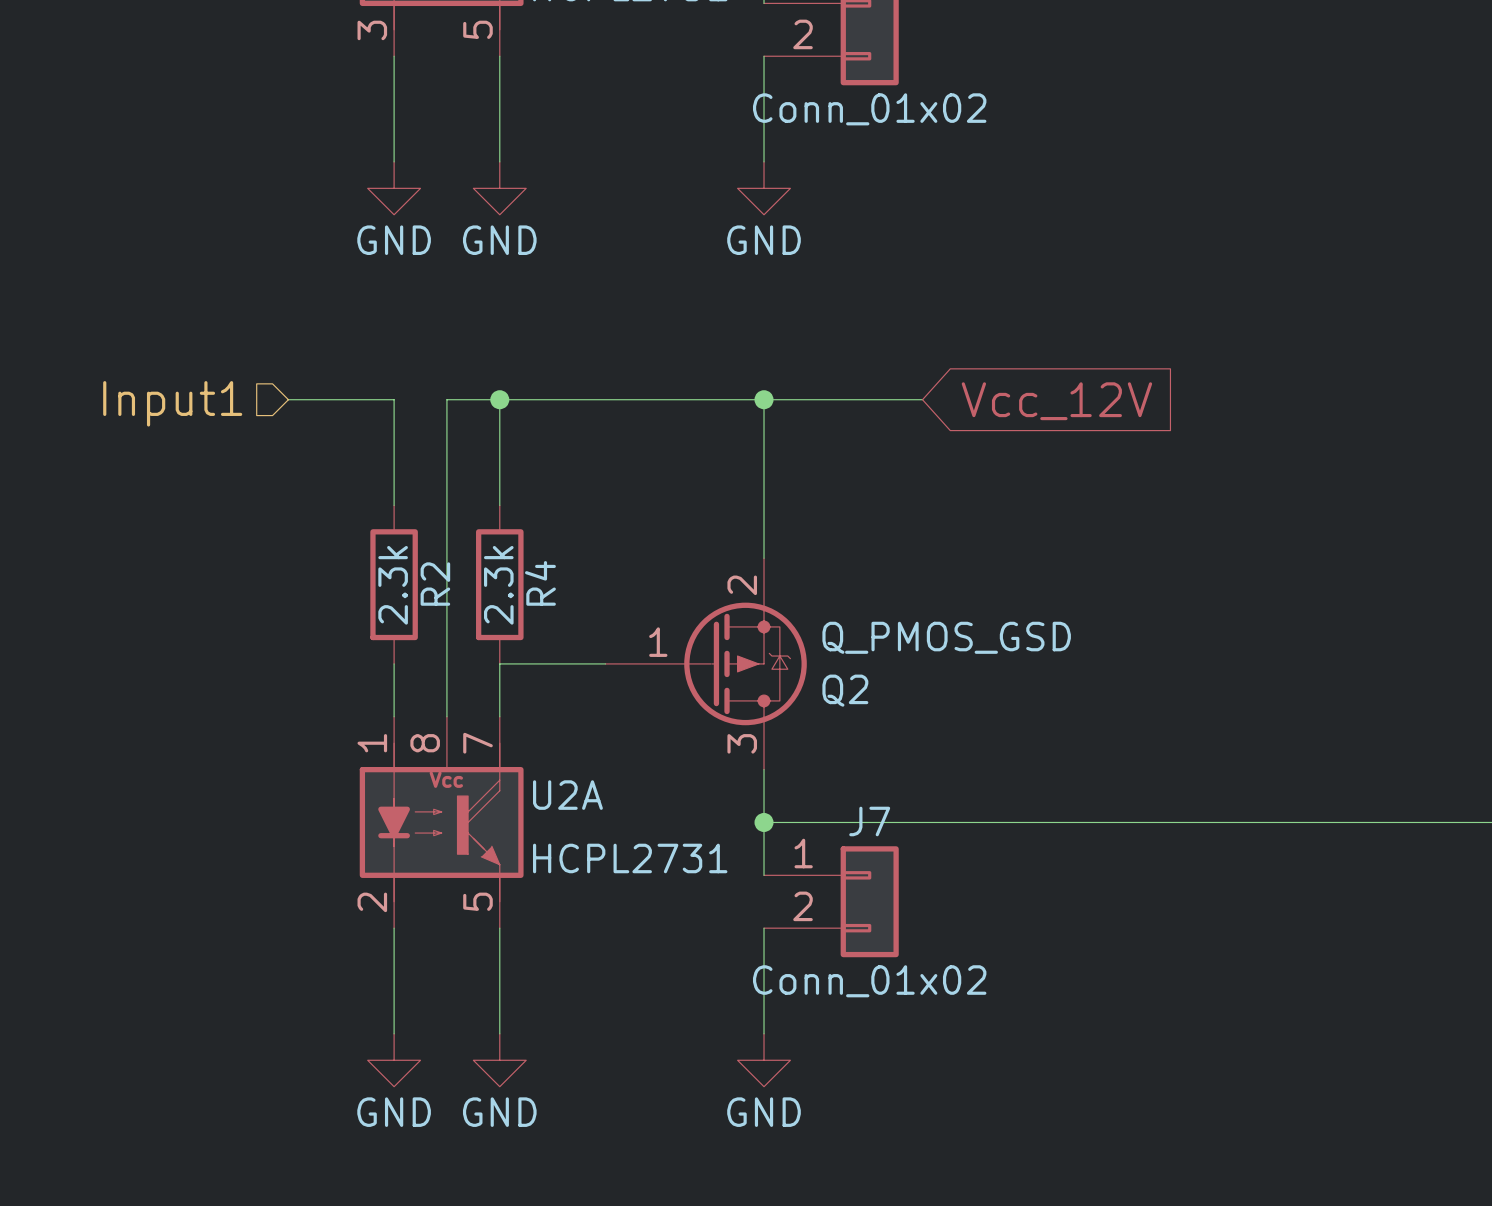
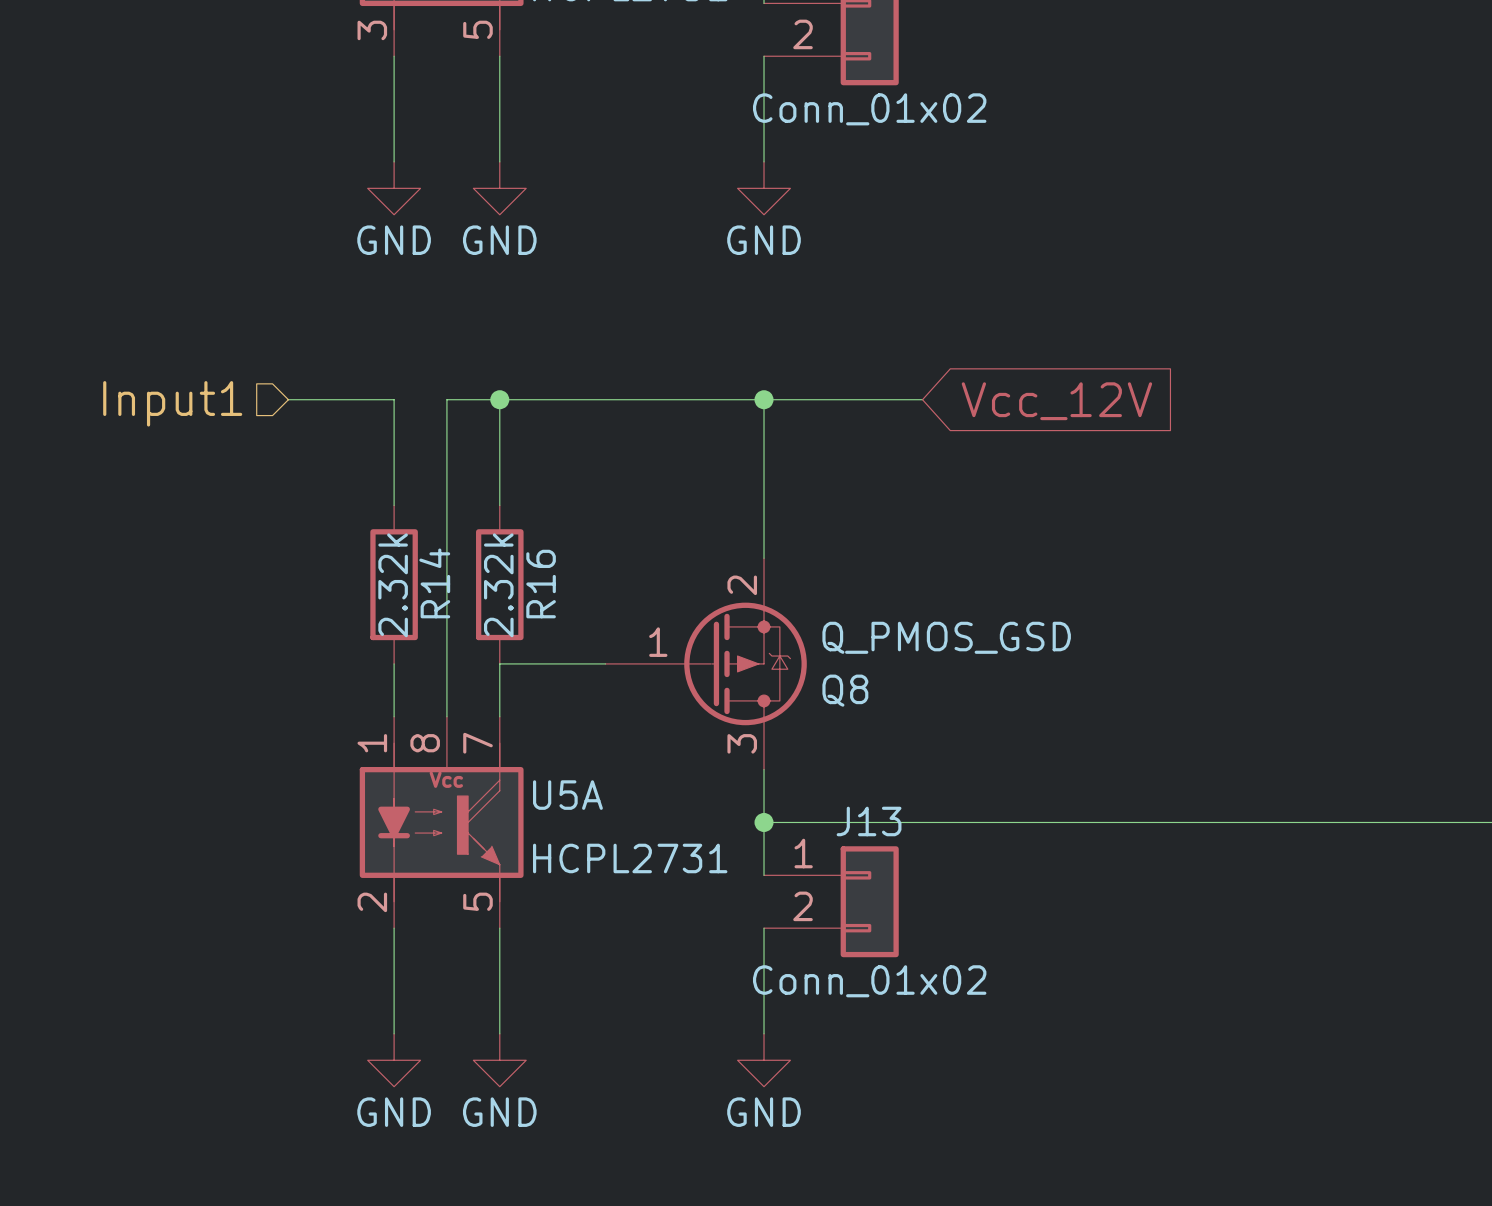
R4 name: R4 (540, 583) -> R16 (541, 584)
R2 name: R2 (435, 584) -> R14 (434, 583)
R2 value: 2.3k (393, 585) -> 2.32k (393, 585)
R4 value: 2.3k (498, 585) -> 2.32k (498, 585)
Q2 name: Q2 (845, 690) -> Q8 (845, 690)
U2A name: U2A (567, 795) -> U5A (567, 795)
J7 name: J7 (869, 821) -> J13 (869, 821)

